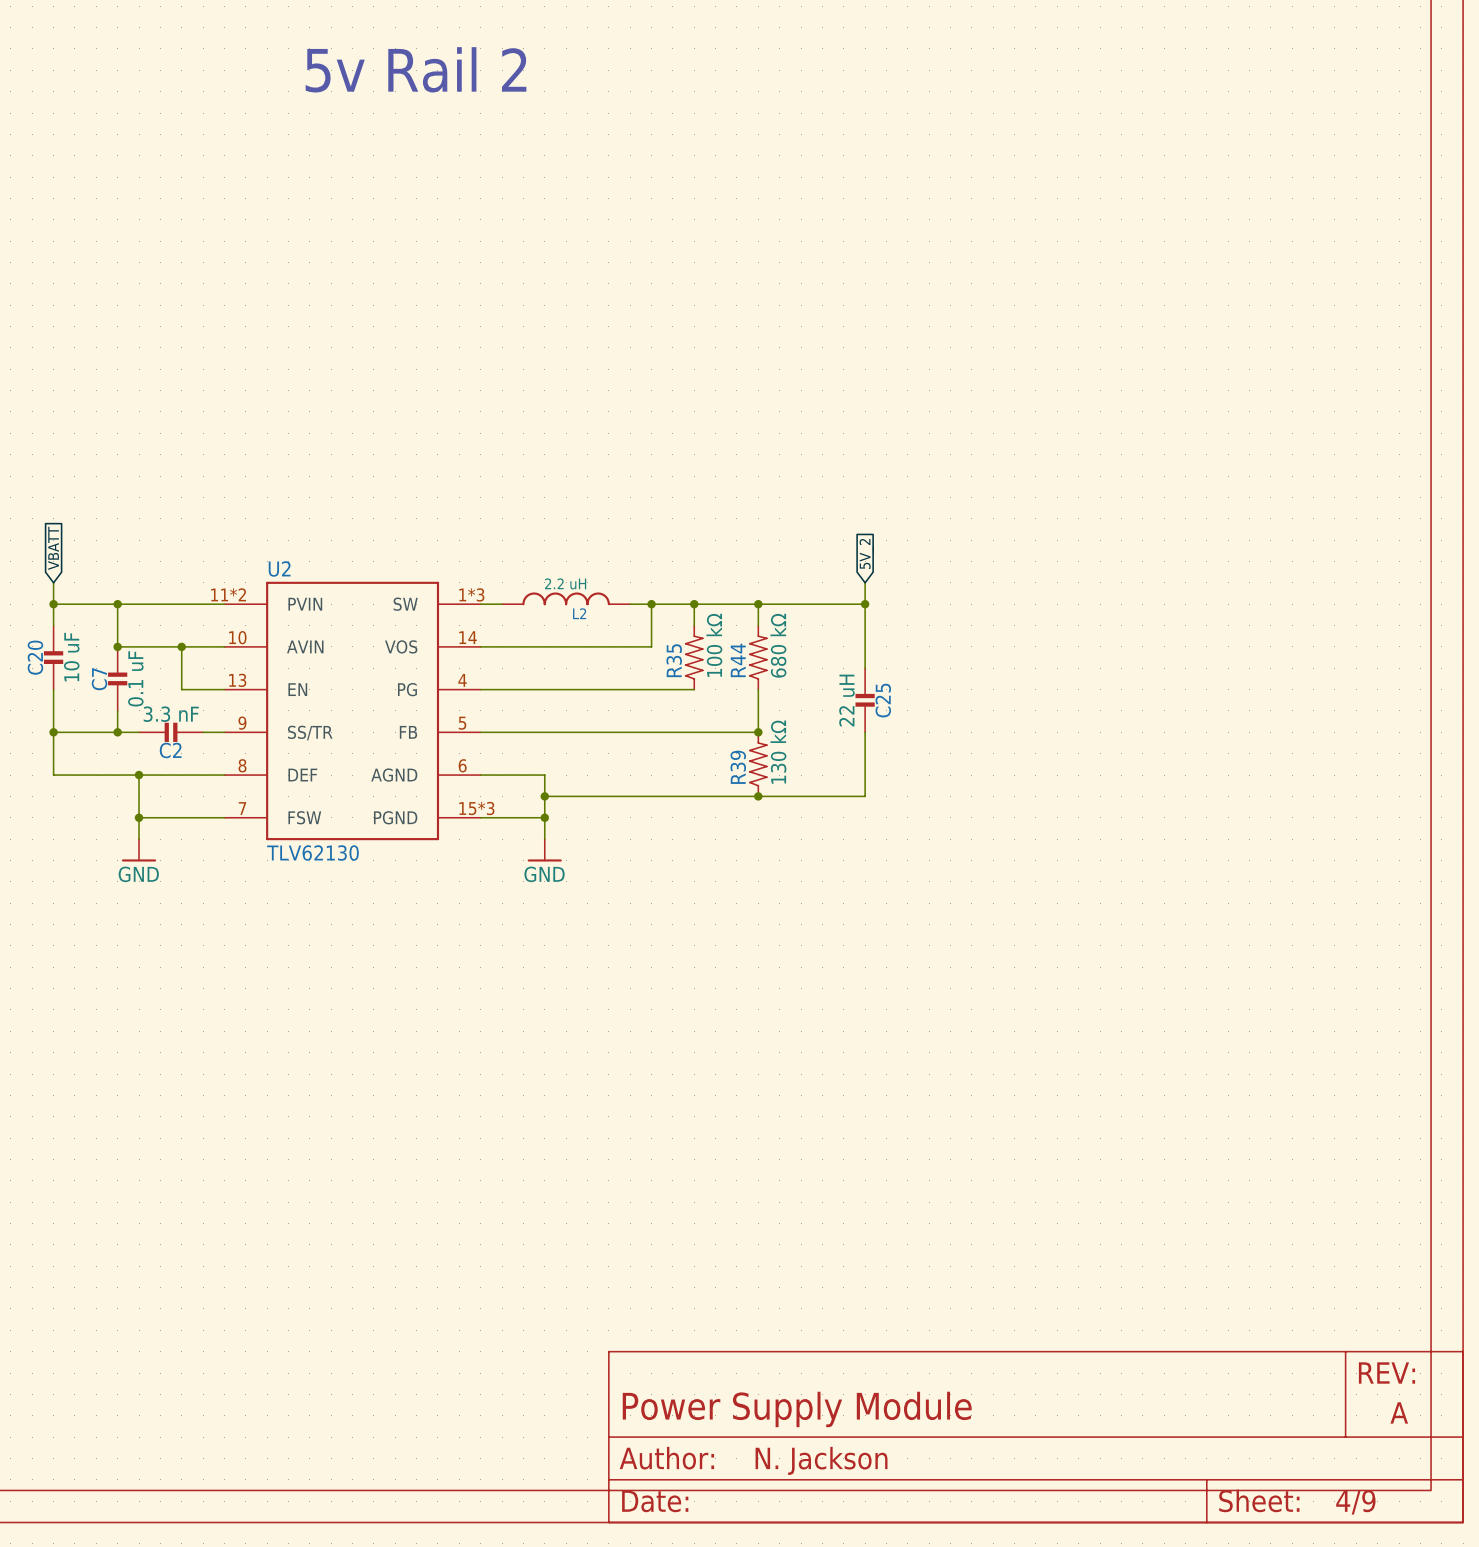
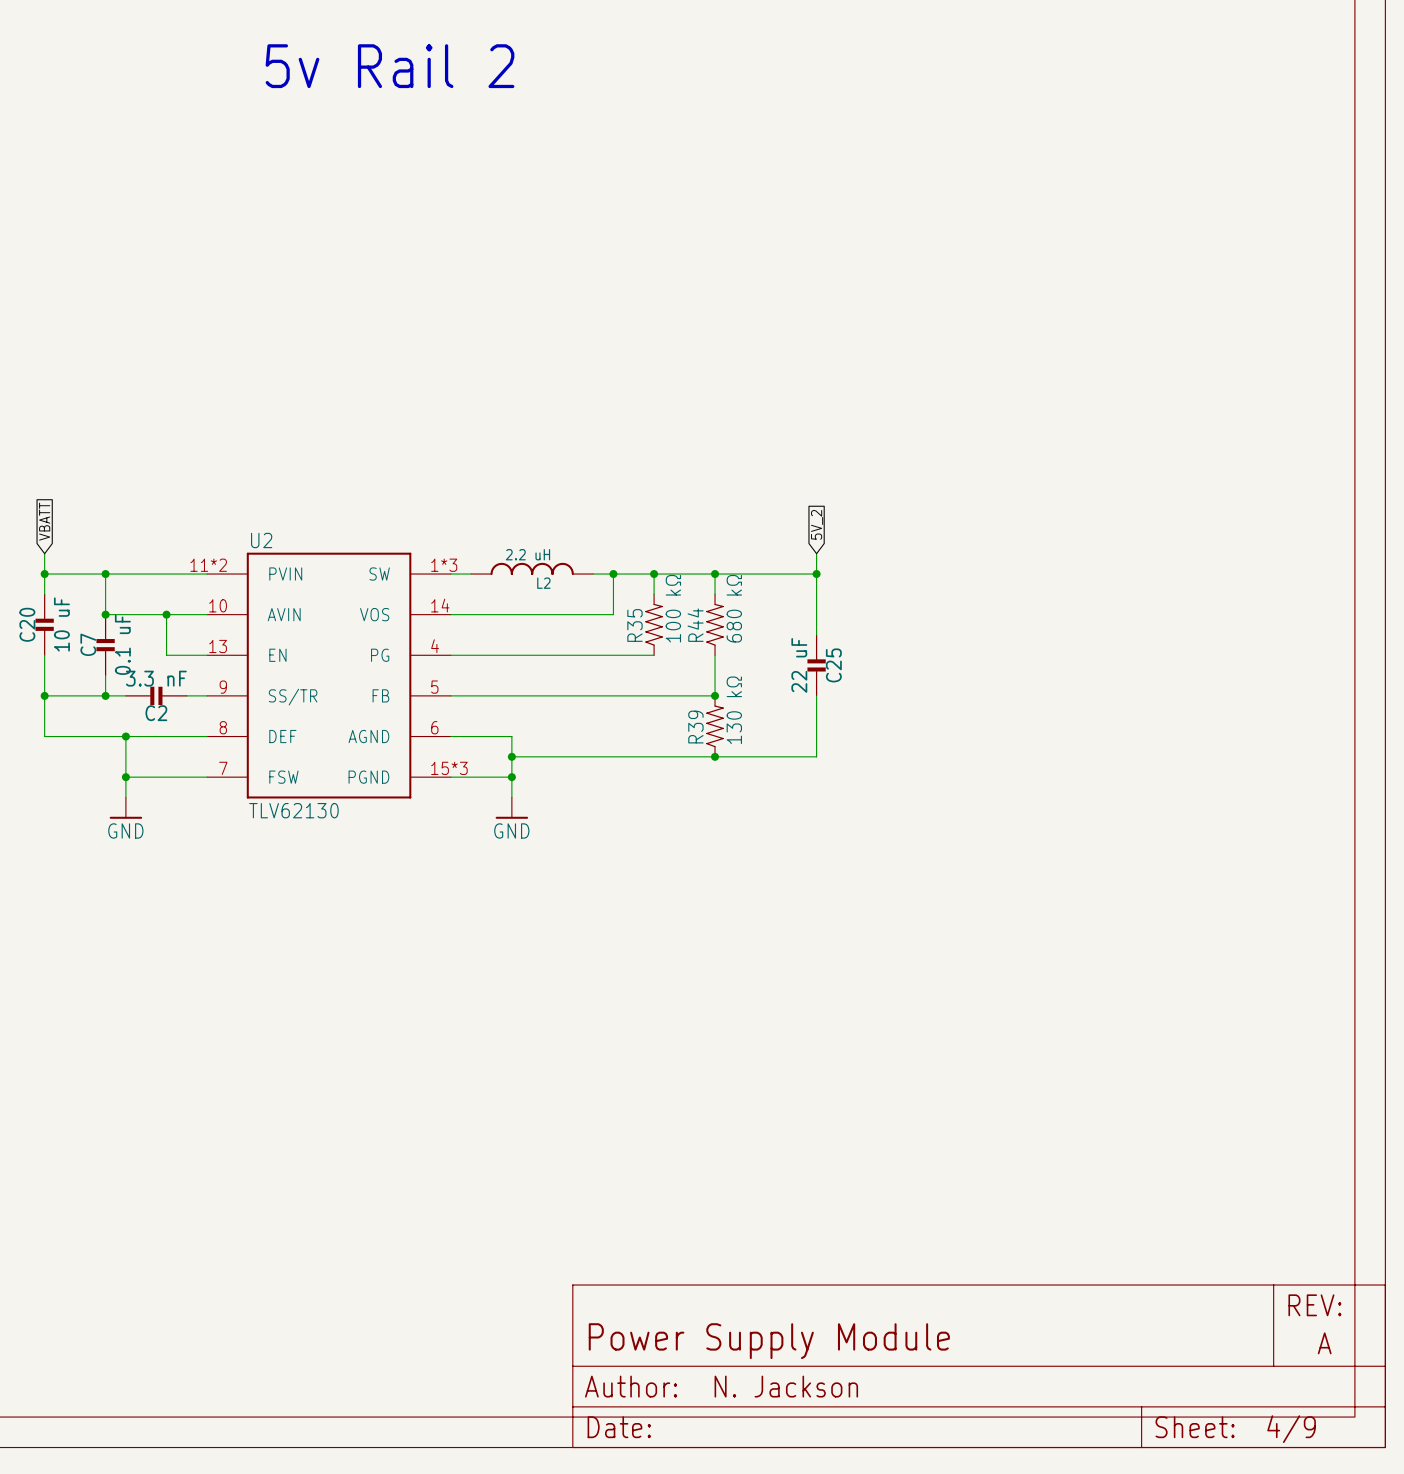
C25 value: 22 uH (846, 700) -> 22 uF (799, 665)

